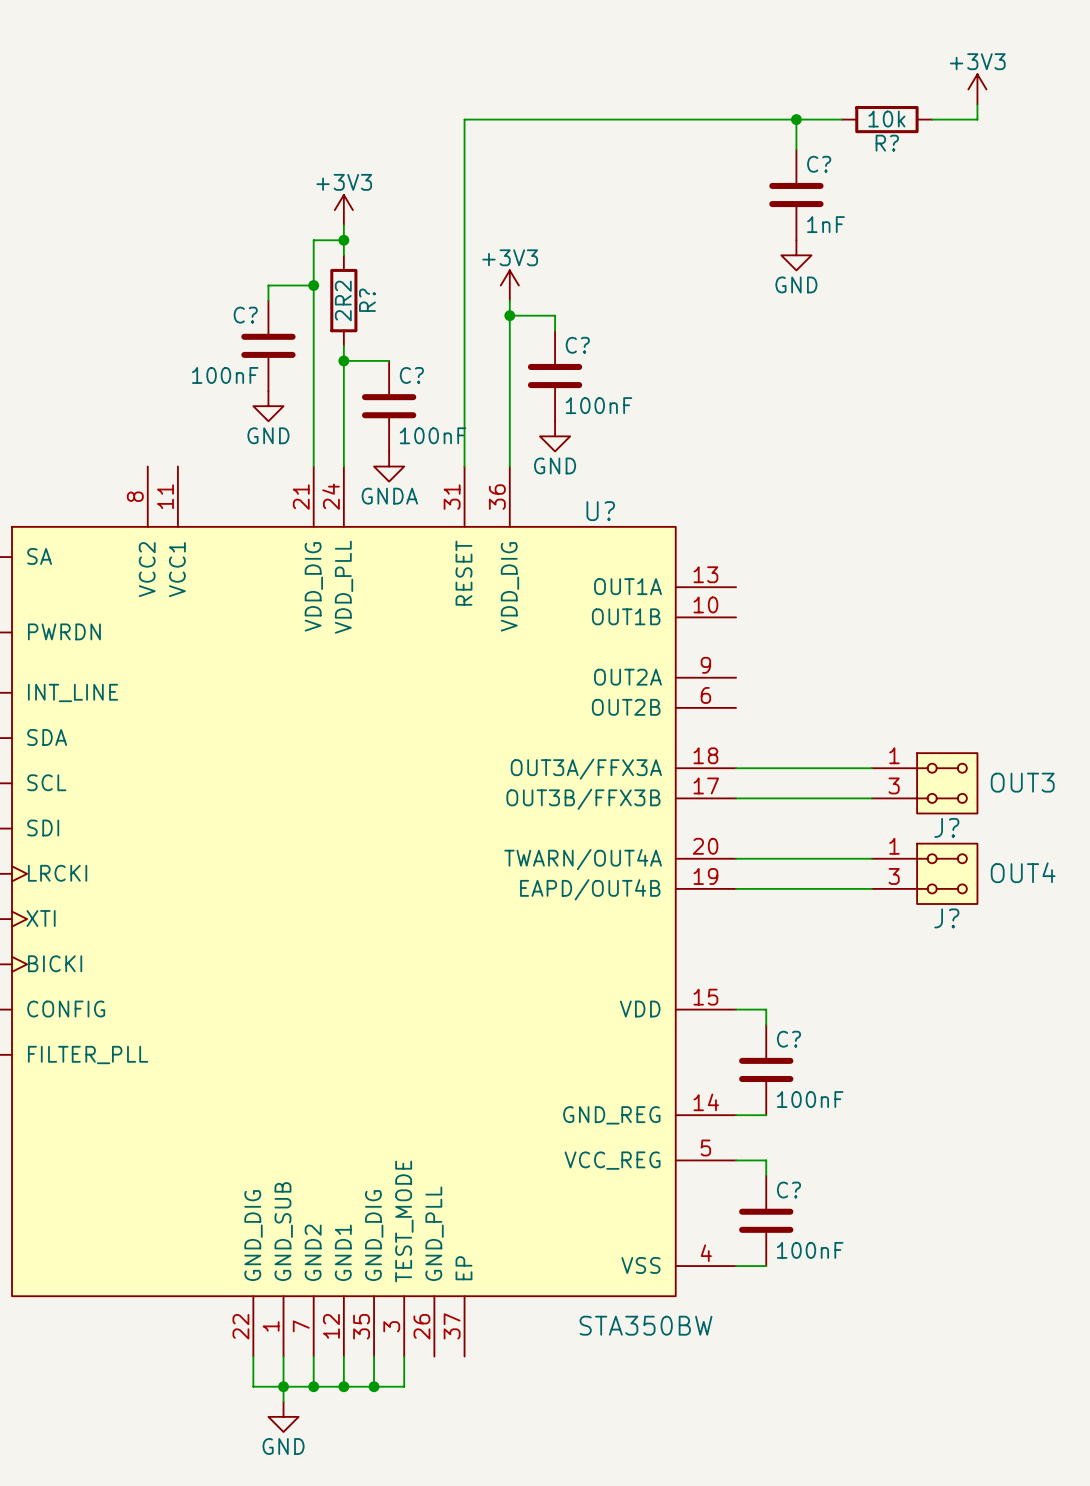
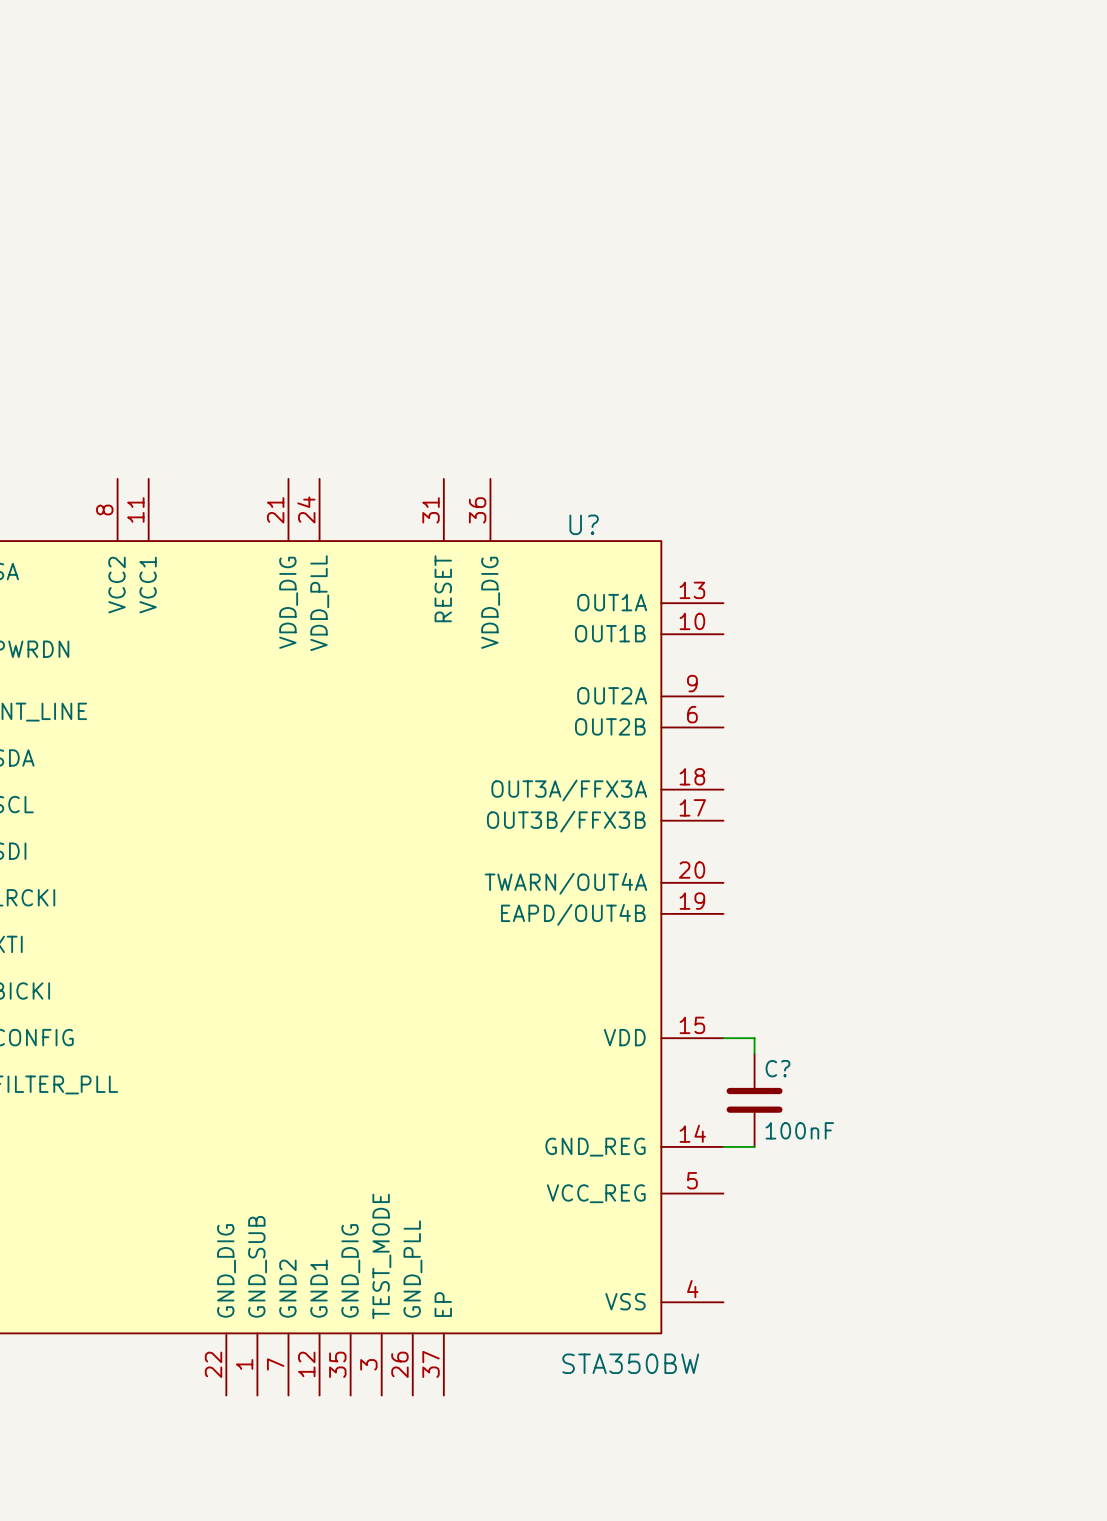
power symbol: +3V3 (977, 89) -> none
wire: (977, 104) (977, 119) (932, 119) -> none
wire: (796, 119) (796, 149) -> none
junction: (796, 119) -> none
wire: (841, 119) (464, 119) (464, 466) -> none
R?: 10k (886, 119) -> none
C?: 1nF (796, 195) -> none
power symbol: +3V3 (343, 210) -> none
wire: (343, 225) (343, 255) -> none
wire: (343, 240) (313, 240) (313, 466) -> none
junction: (343, 240) -> none
power symbol: GND (796, 255) -> none
wire: (313, 285) (268, 285) (268, 300) -> none
junction: (313, 285) -> none
power symbol: +3V3 (509, 285) -> none
R?: 2R2 (343, 300) -> none
wire: (509, 300) (509, 466) -> none
wire: (509, 315) (555, 315) (555, 330) -> none
junction: (509, 315) -> none
C?: 100nF (268, 345) -> none
wire: (343, 345) (343, 466) -> none
wire: (343, 360) (389, 360) -> none
junction: (343, 360) -> none
C?: 100nF (555, 376) -> none
power symbol: GND (268, 406) -> none
C?: 100nF (389, 406) -> none
power symbol: GND (555, 436) -> none
power symbol: GNDA (389, 466) -> none
wire: (736, 768) (871, 768) -> none
J?: OUT3 (924, 783) -> none
wire: (736, 798) (871, 798) -> none
wire: (736, 858) (871, 858) -> none
J?: OUT4 (924, 873) -> none
wire: (736, 888) (871, 888) -> none
wire: (736, 1160) (766, 1160) (766, 1175) -> none
C?: 100nF (766, 1220) -> none
wire: (736, 1266) (766, 1266) -> none
wire: (253, 1356) (253, 1386) (404, 1386) (404, 1356) -> none
wire: (283, 1356) (283, 1401) -> none
wire: (313, 1356) (313, 1386) -> none
wire: (343, 1356) (343, 1386) -> none
wire: (374, 1356) (374, 1386) -> none
junction: (283, 1386) -> none
junction: (313, 1386) -> none
junction: (343, 1386) -> none
junction: (374, 1386) -> none
power symbol: GND (283, 1416) -> none

